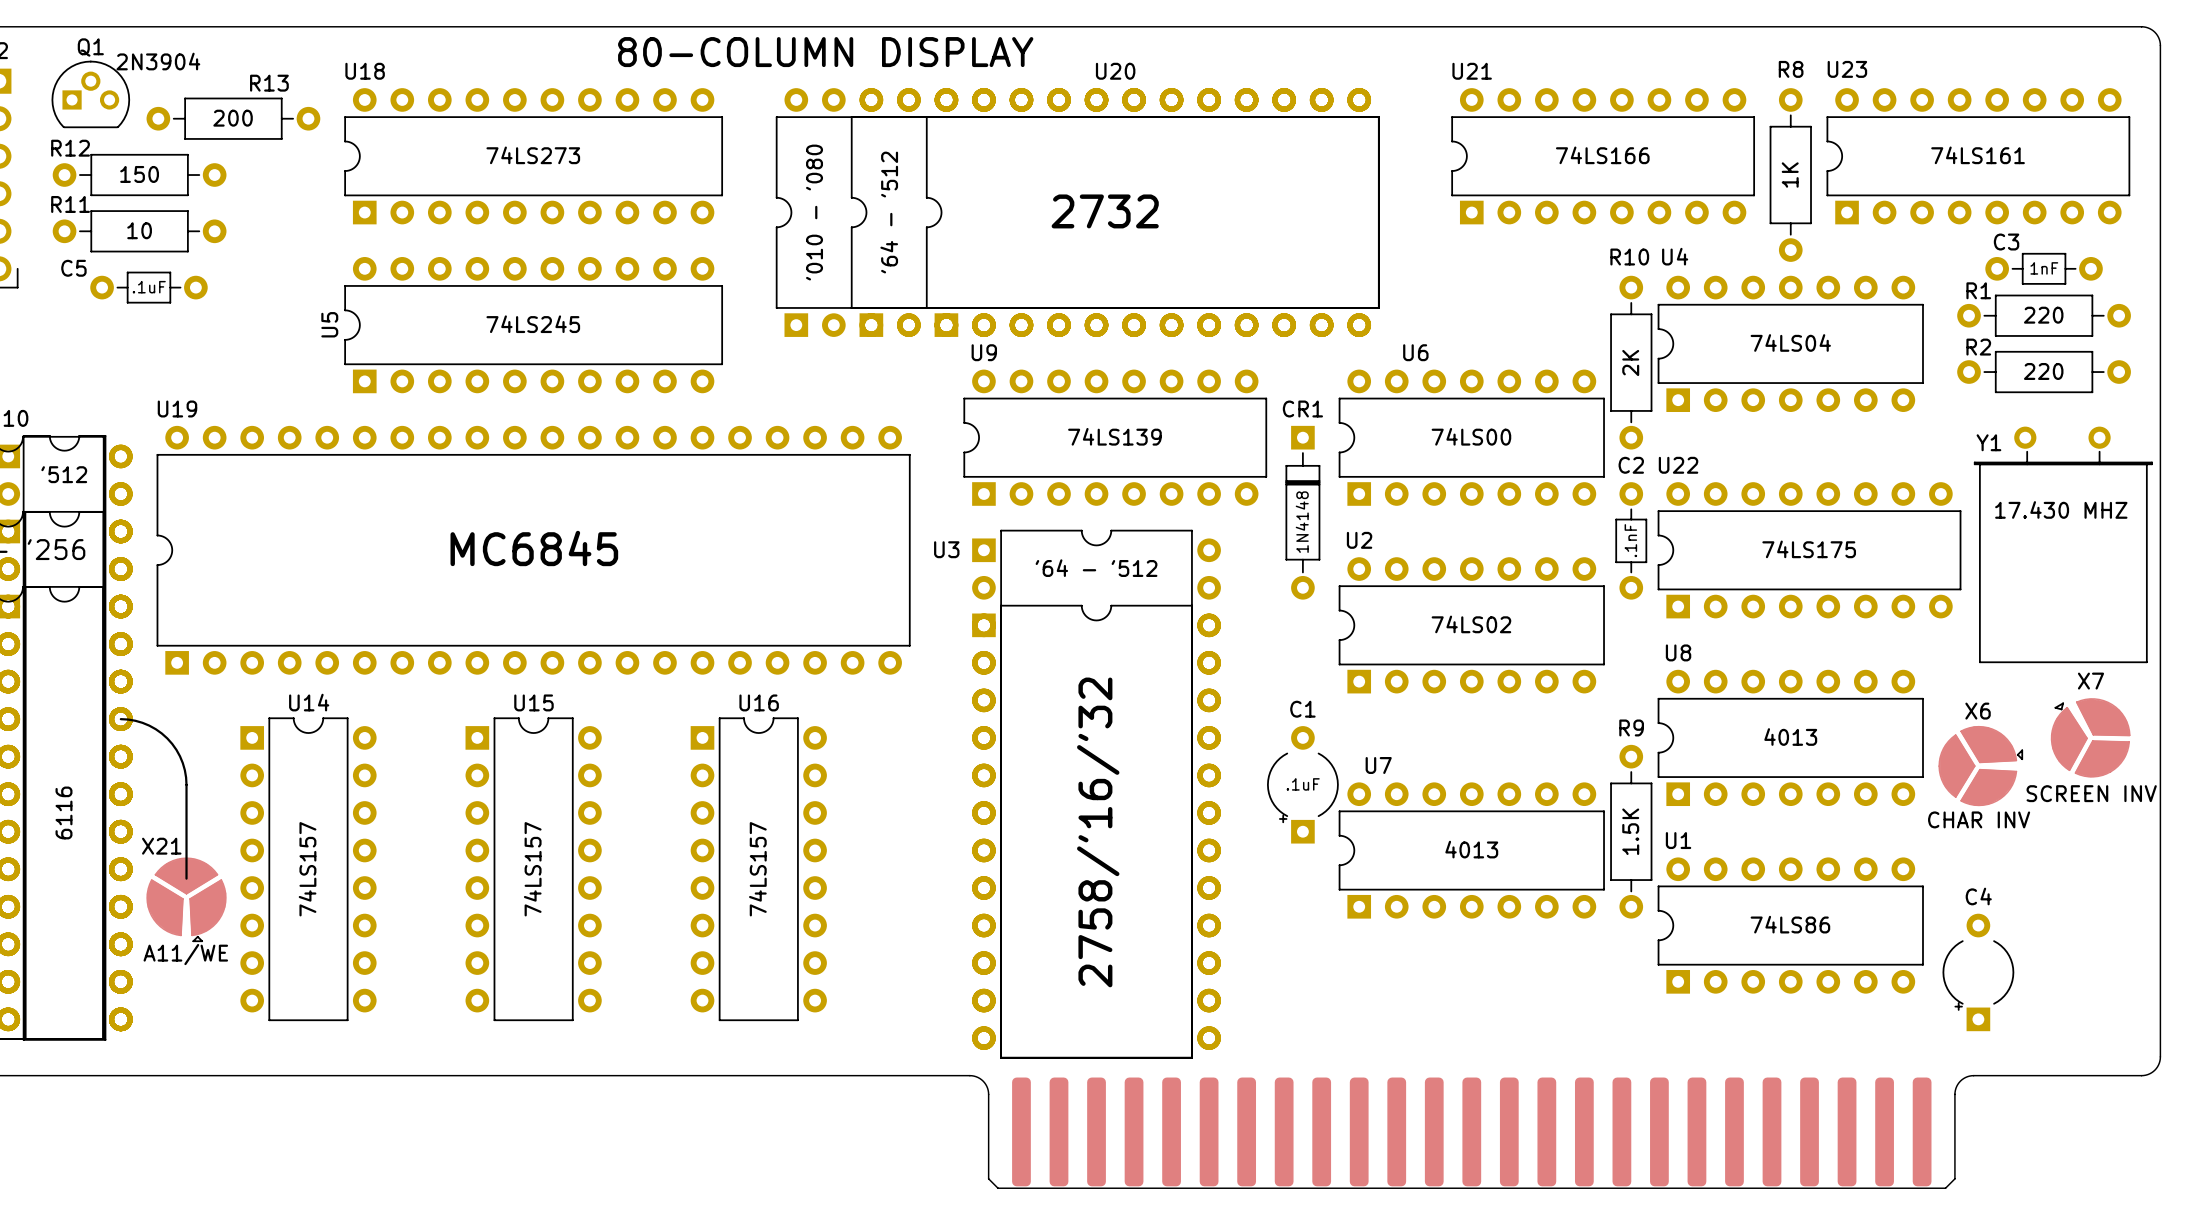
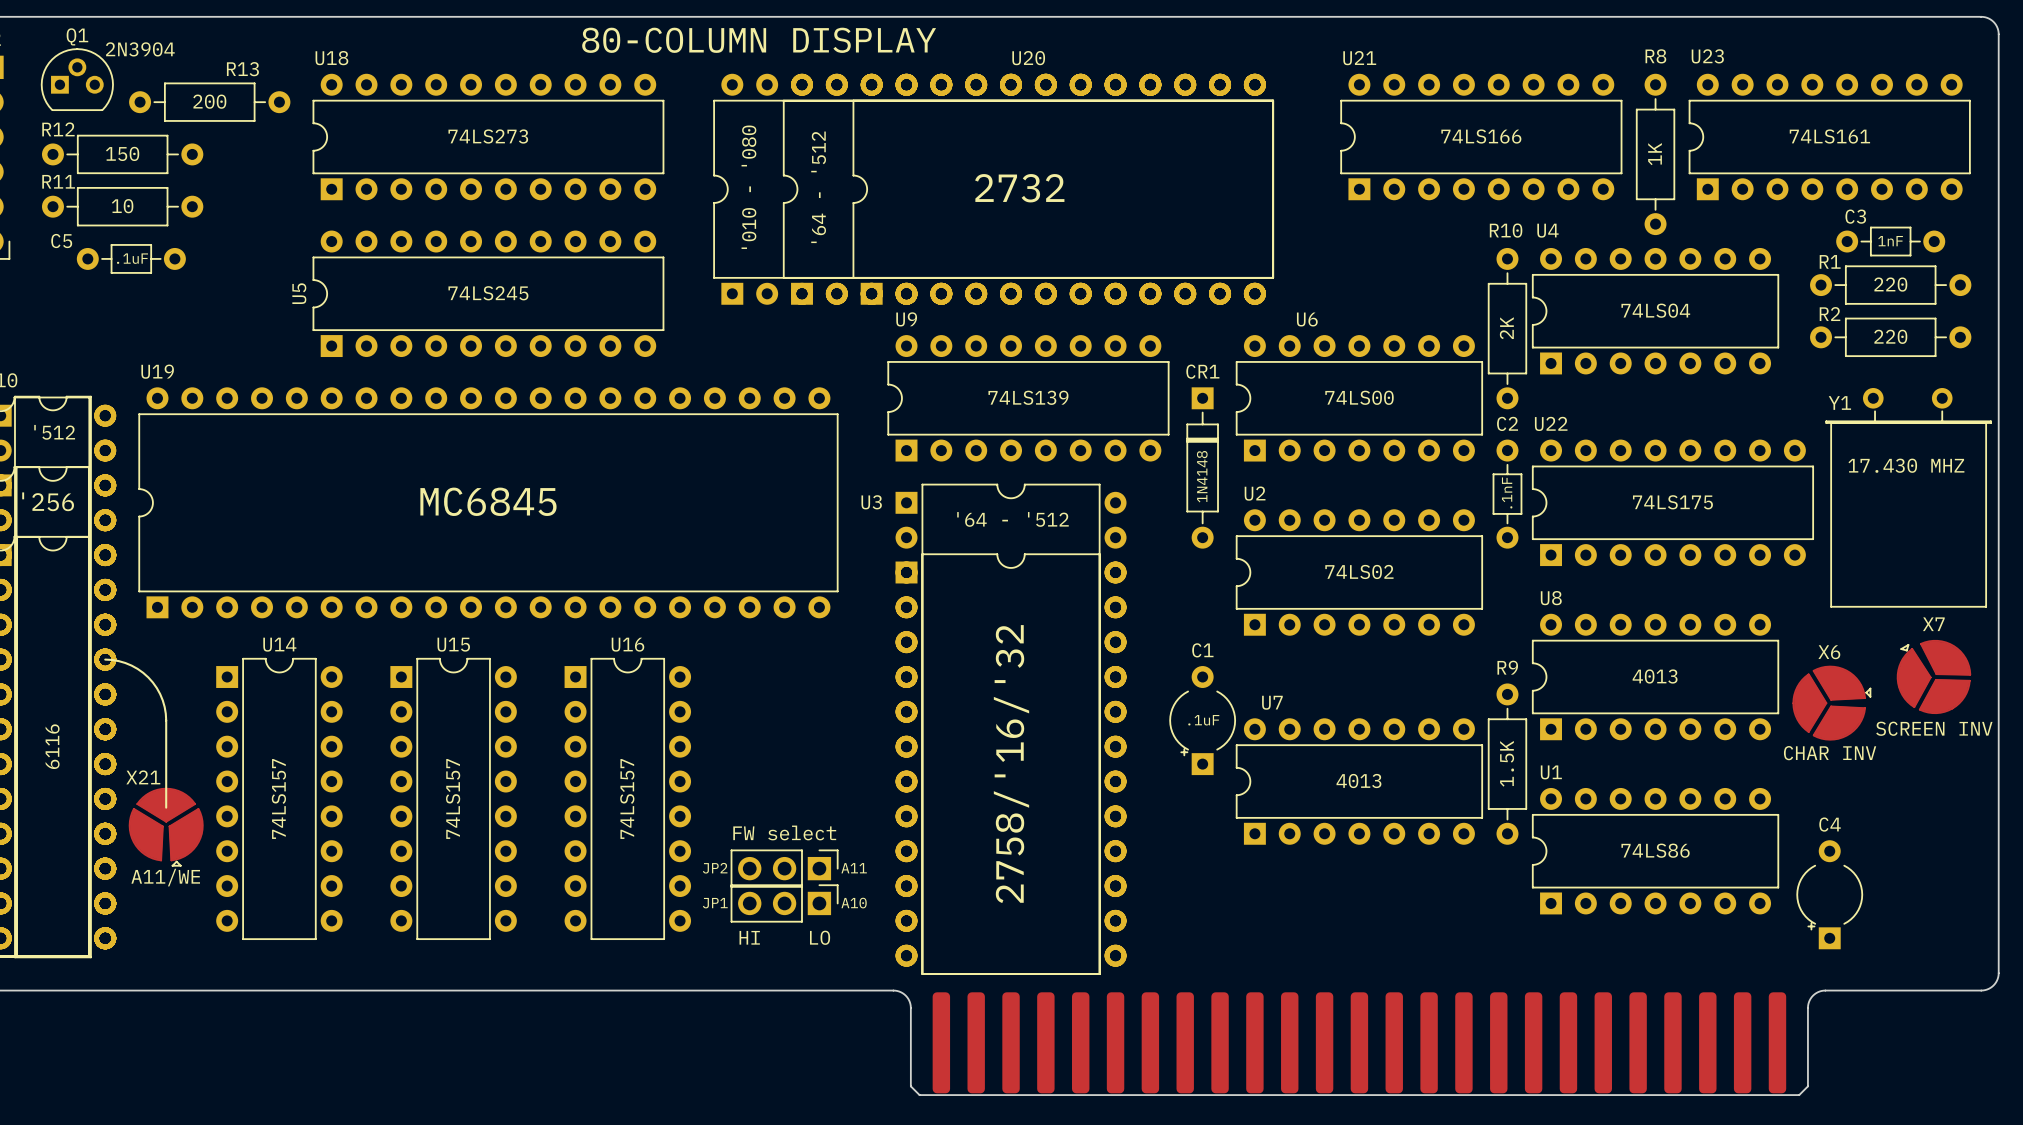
U15 position: (533, 869) -> (453, 798)
U16 position: (758, 869) -> (627, 798)
text: none -> FW select (784, 832)
JP2: none -> A11 (784, 868)
JP1: none -> A10 (784, 903)
text: none -> HI (749, 937)
text: none -> LO (820, 937)

